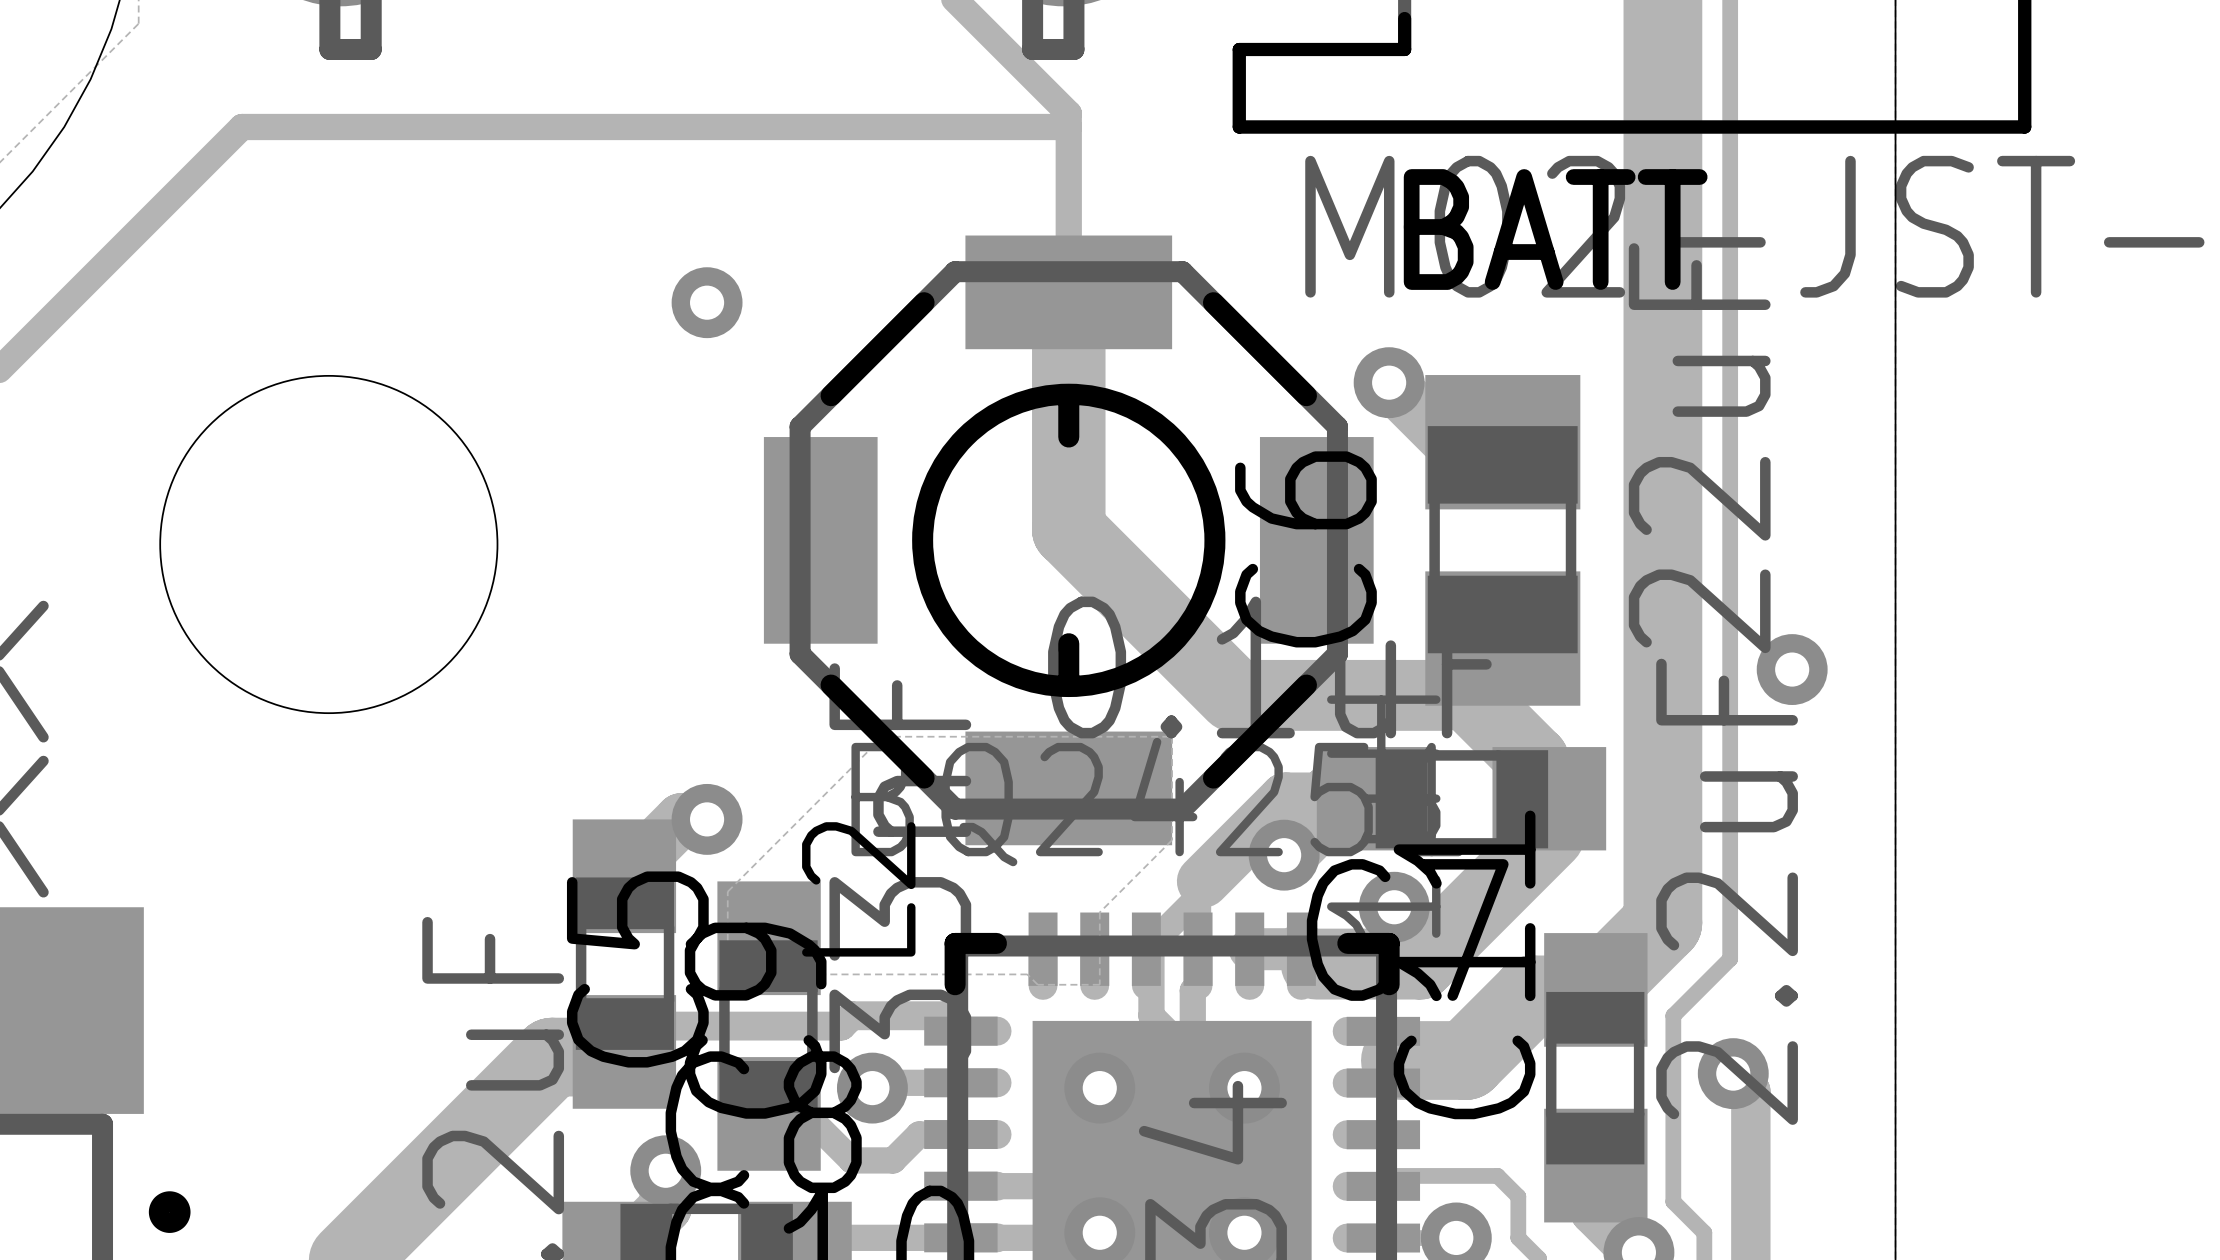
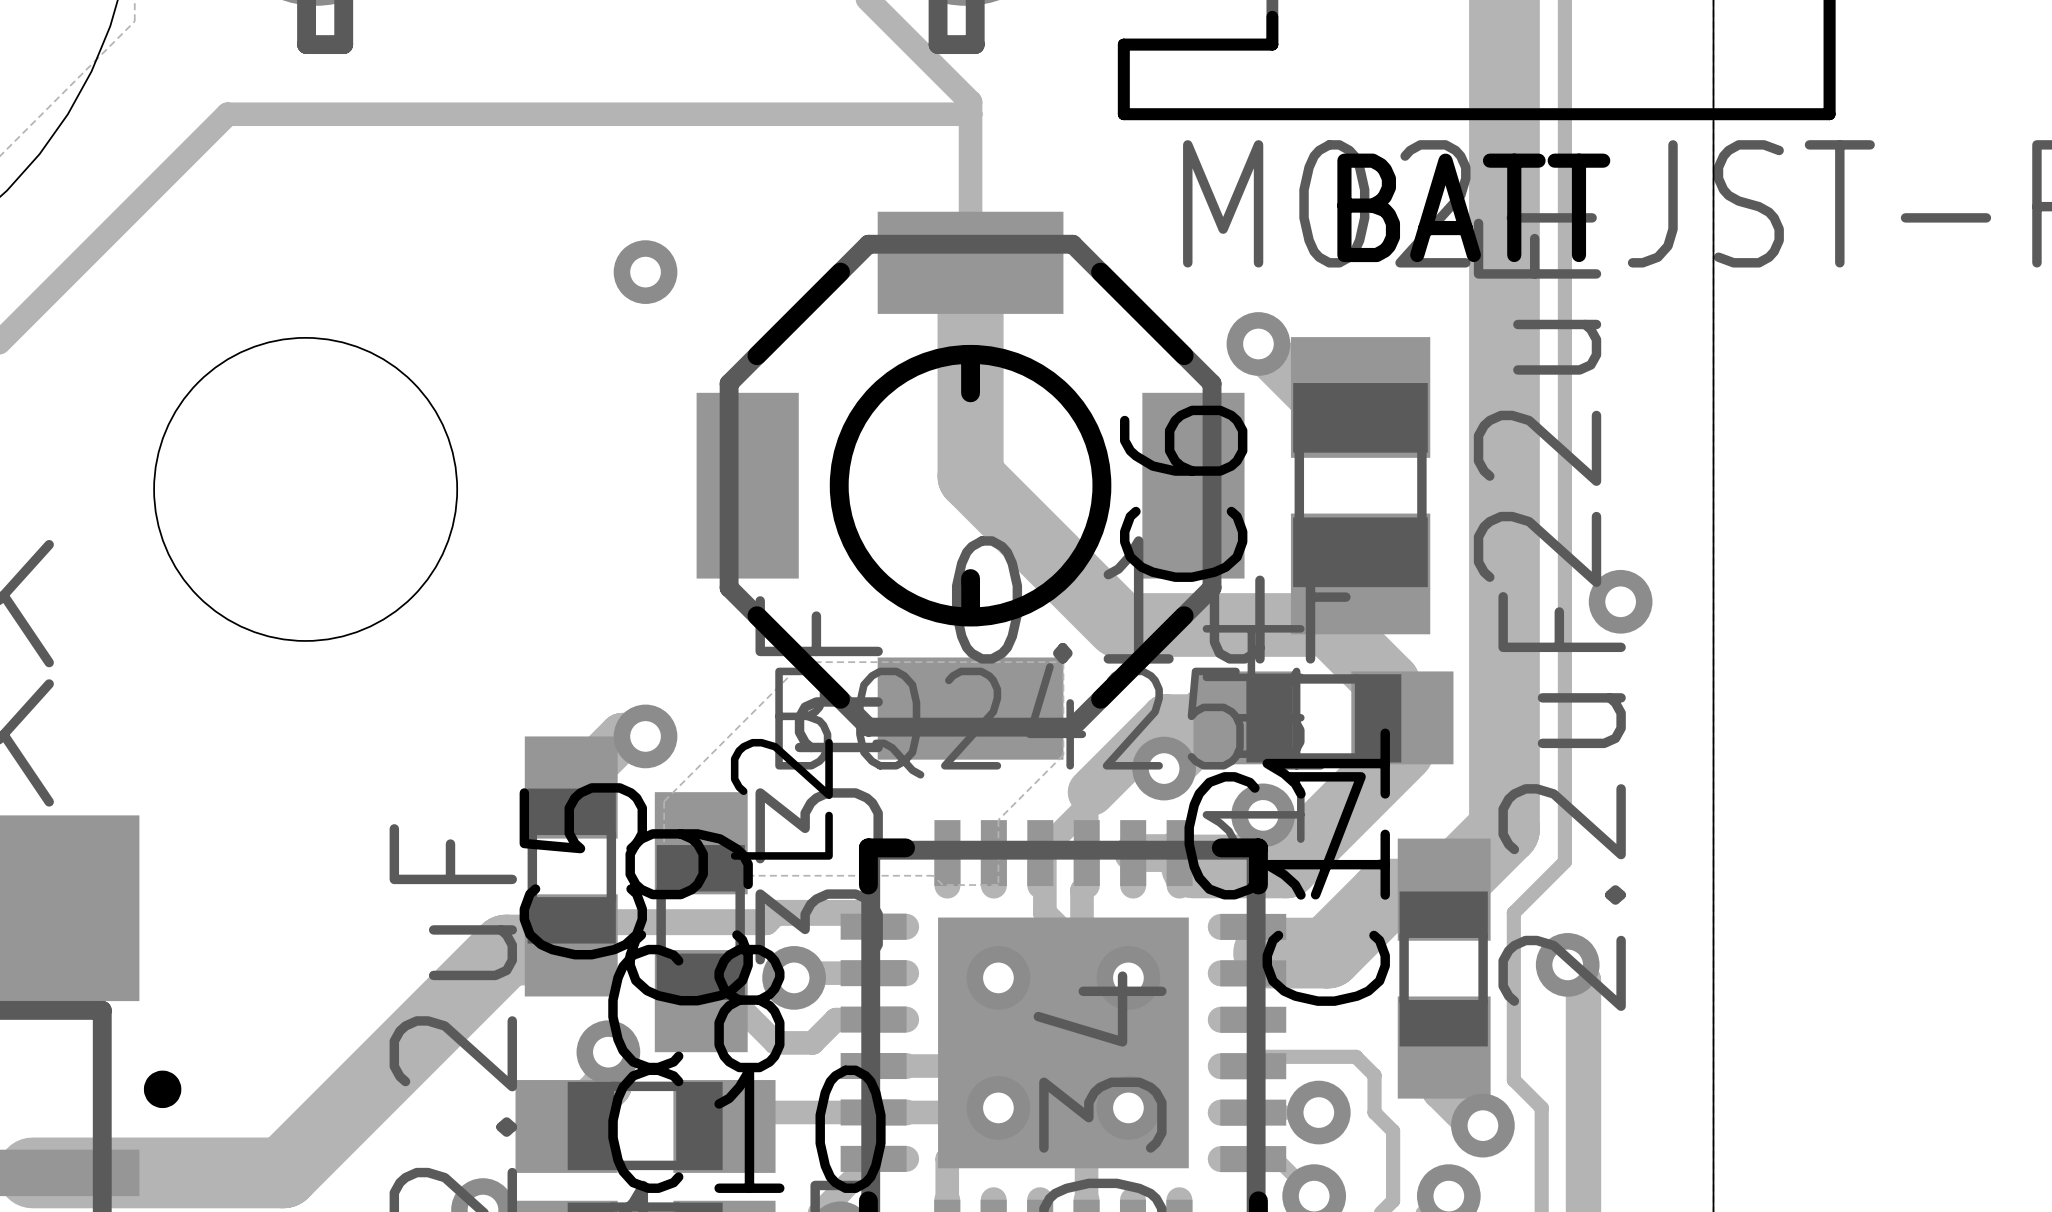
text position: BATT (1555, 229) -> BATT (1473, 207)

